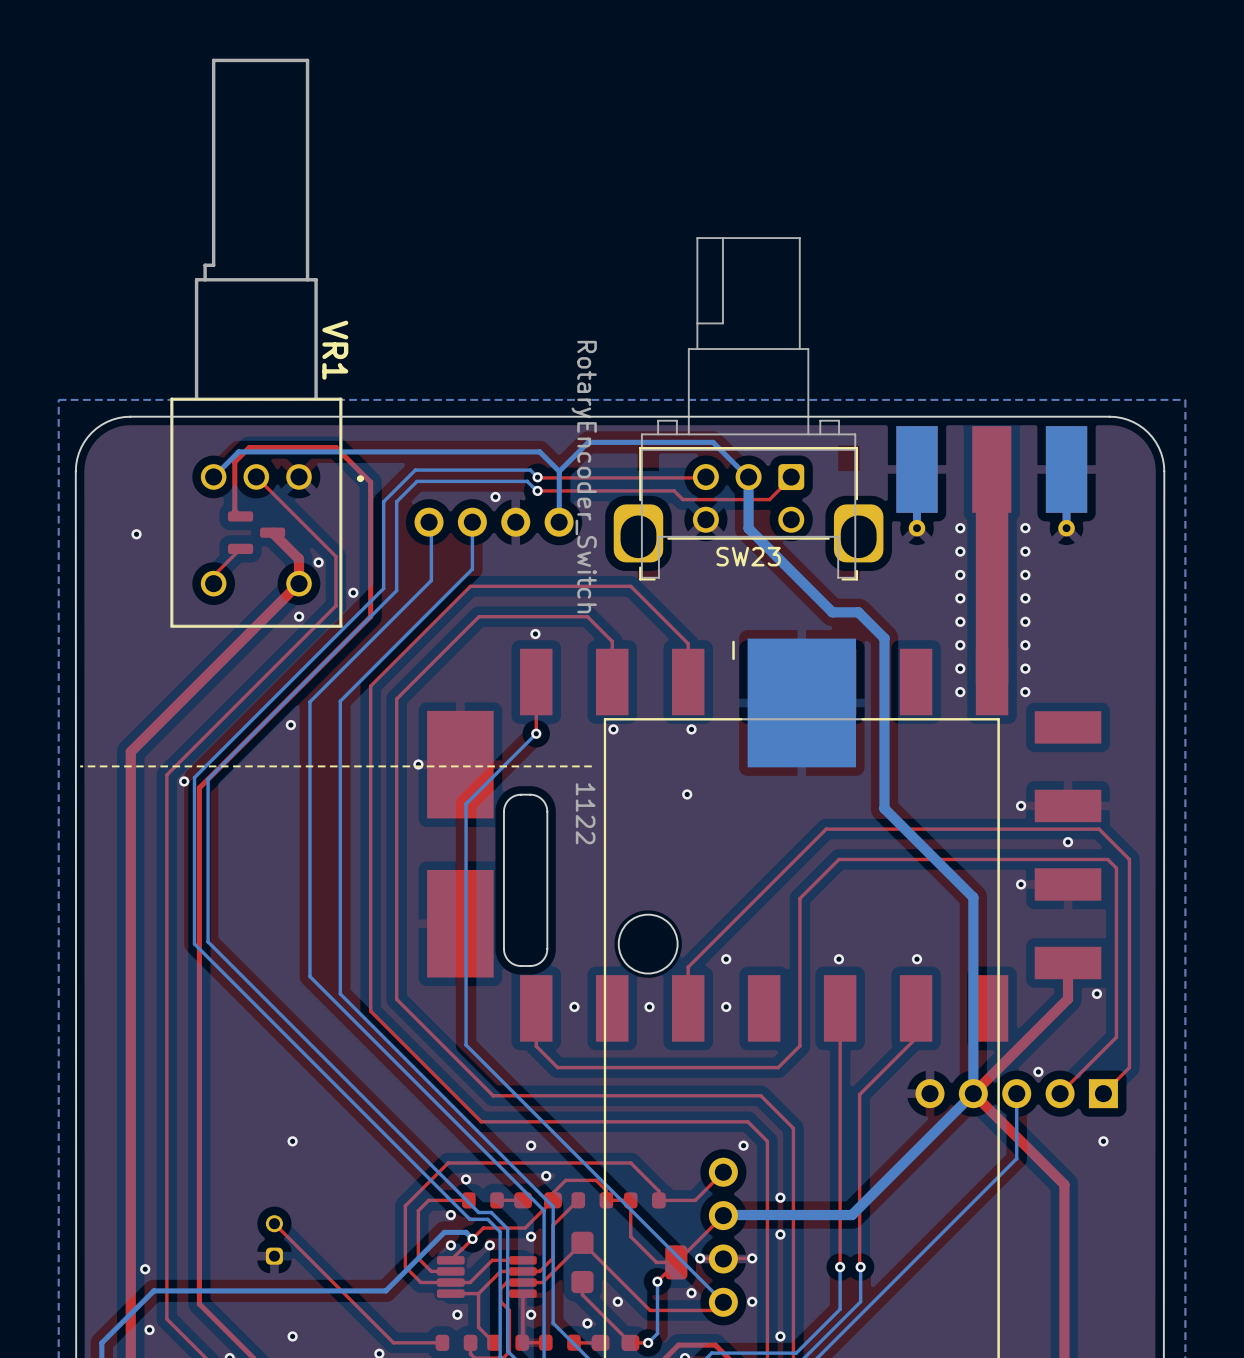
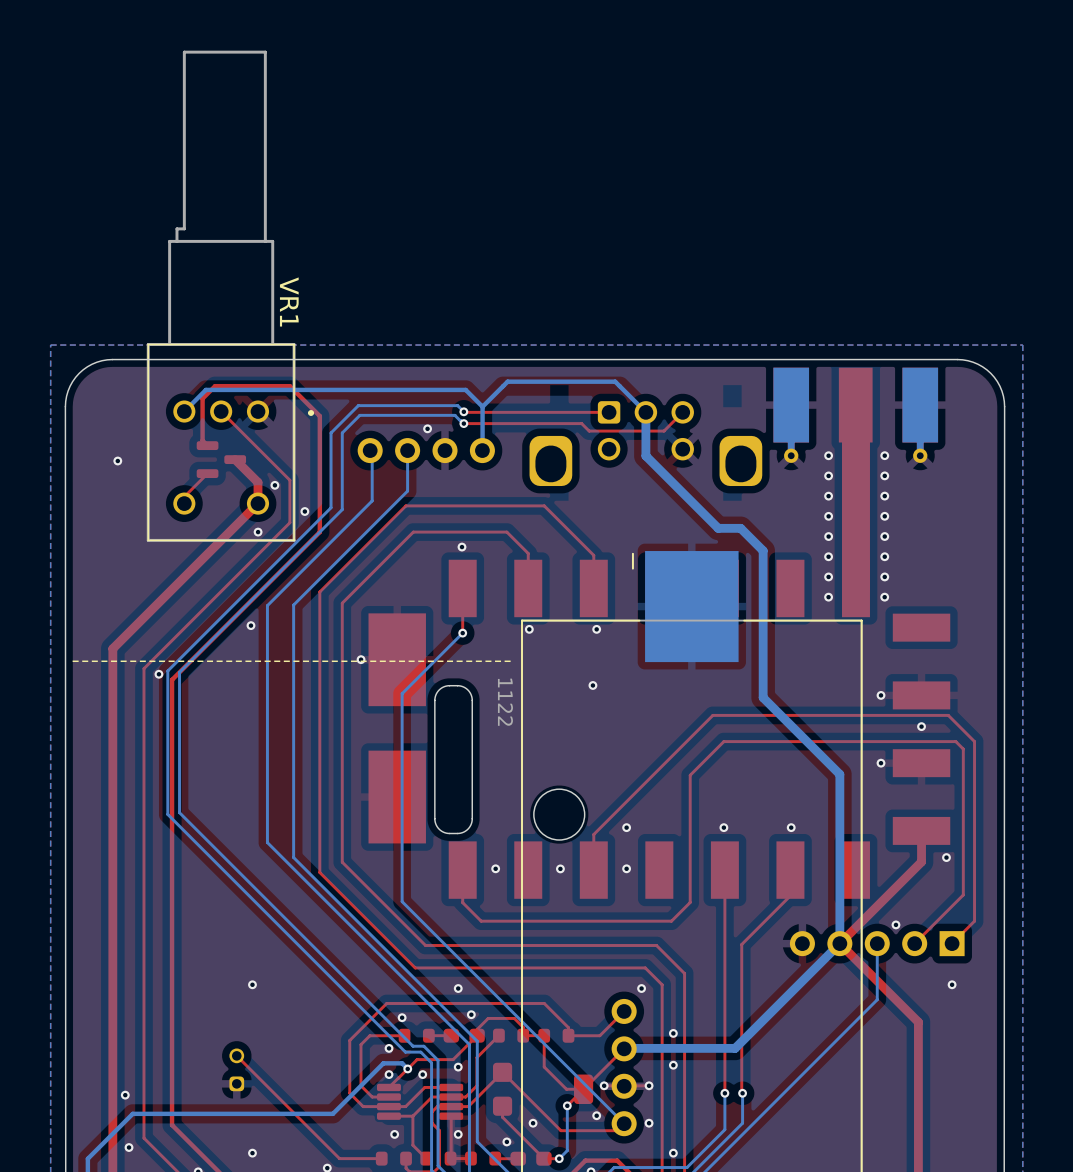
SW23 side: bottom (748, 408) -> top (645, 443)

